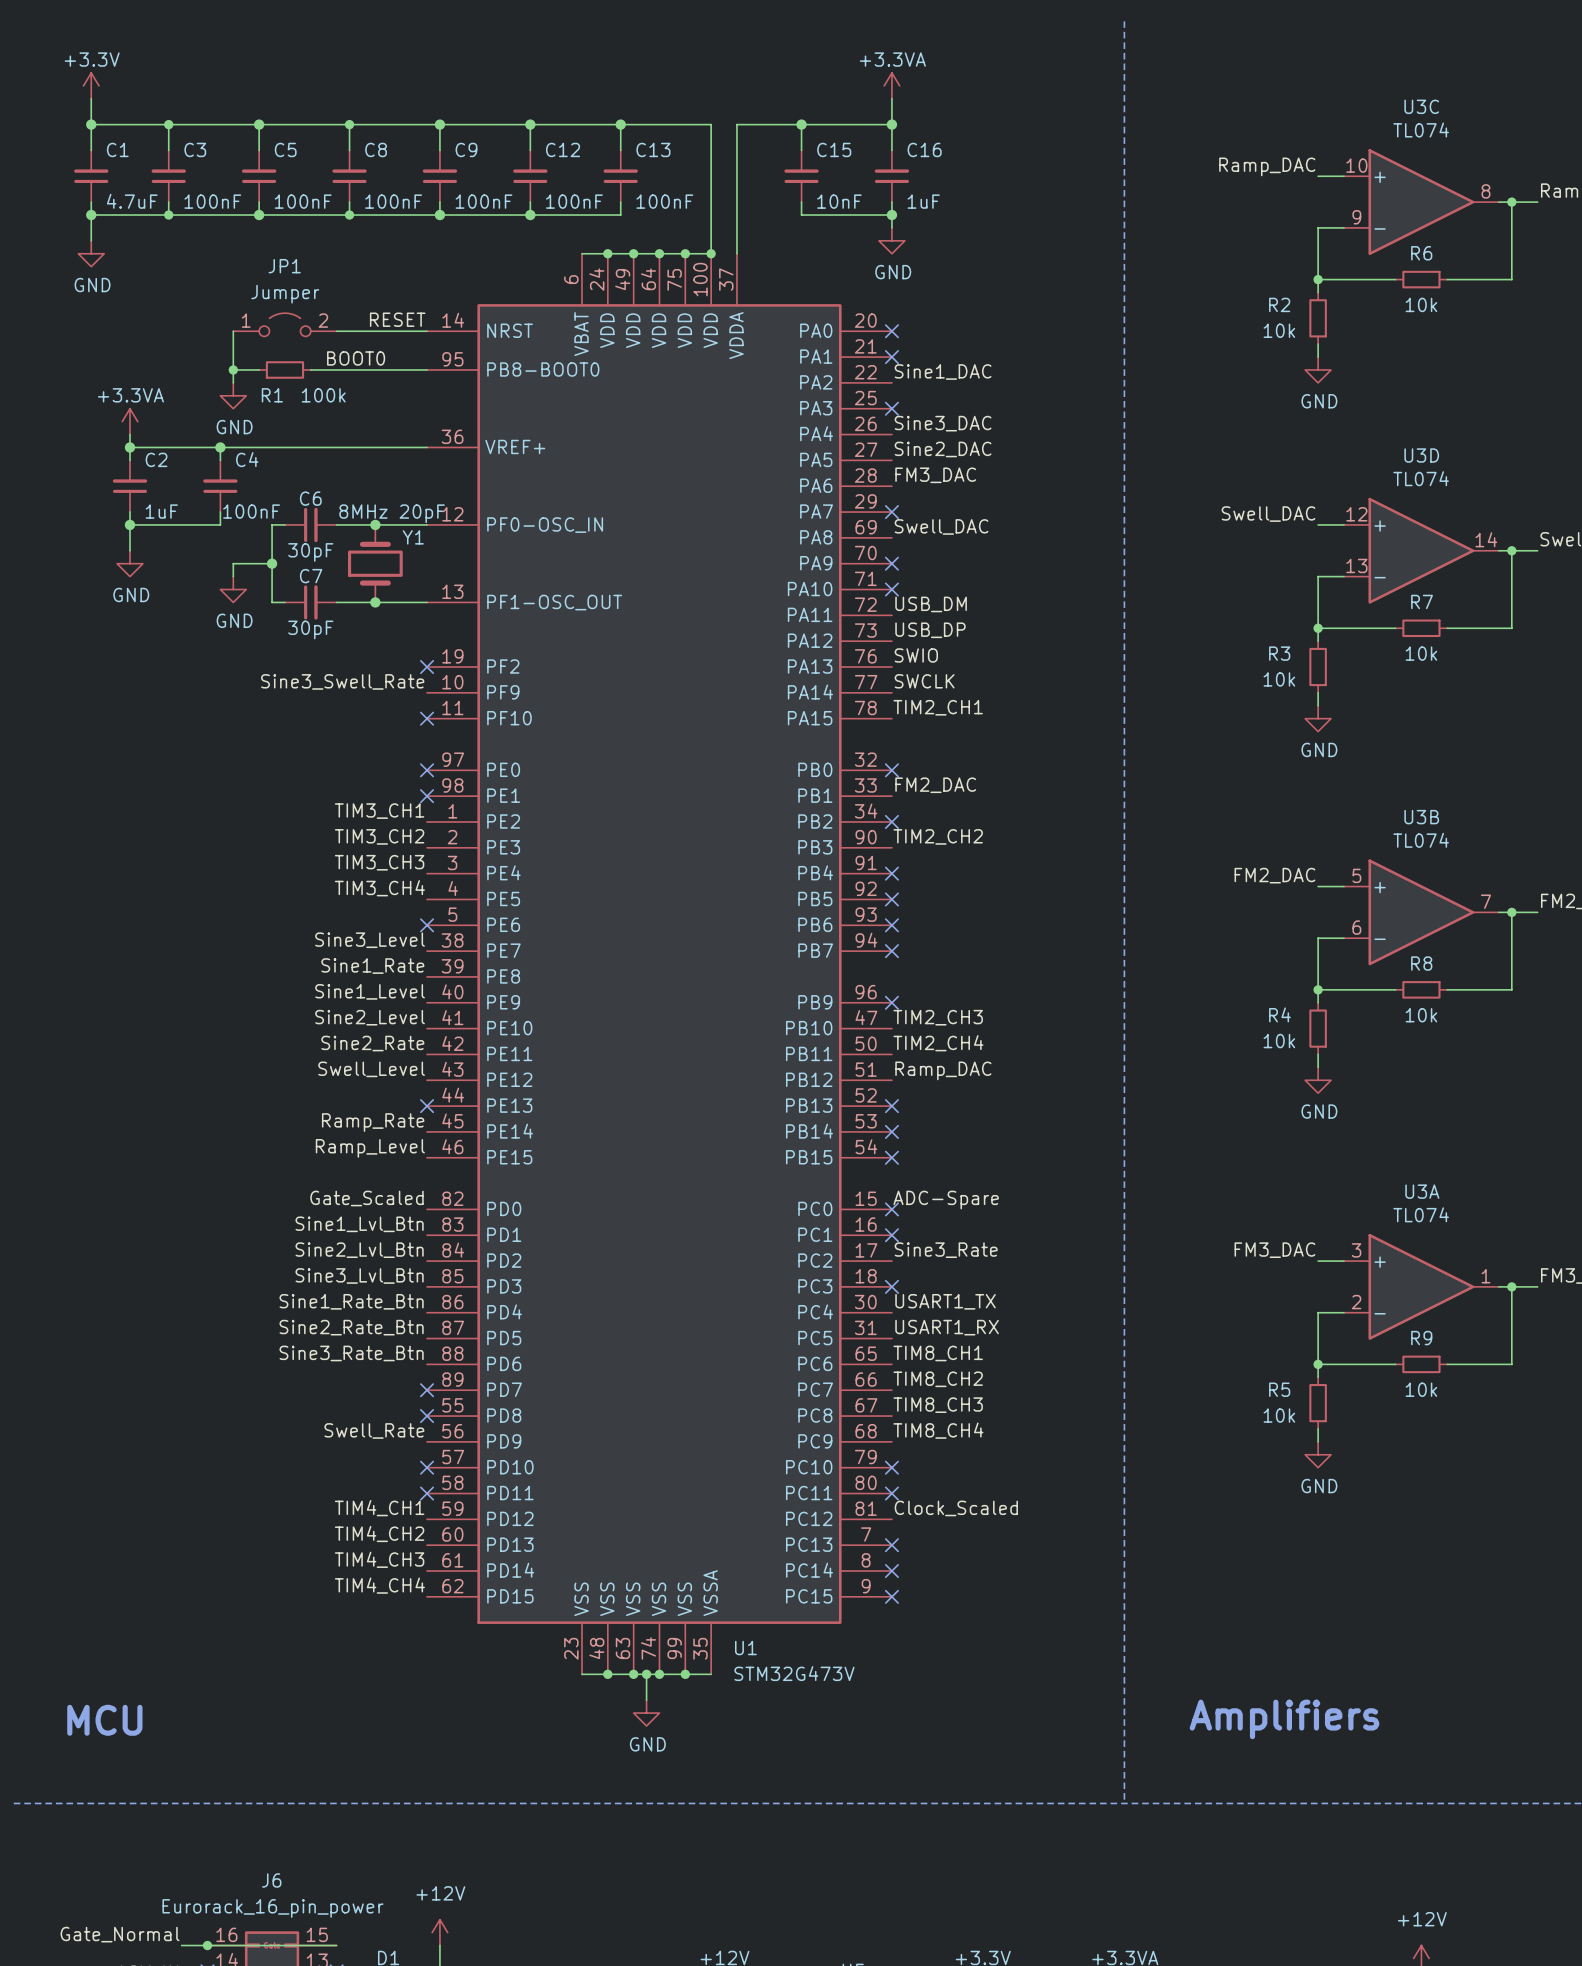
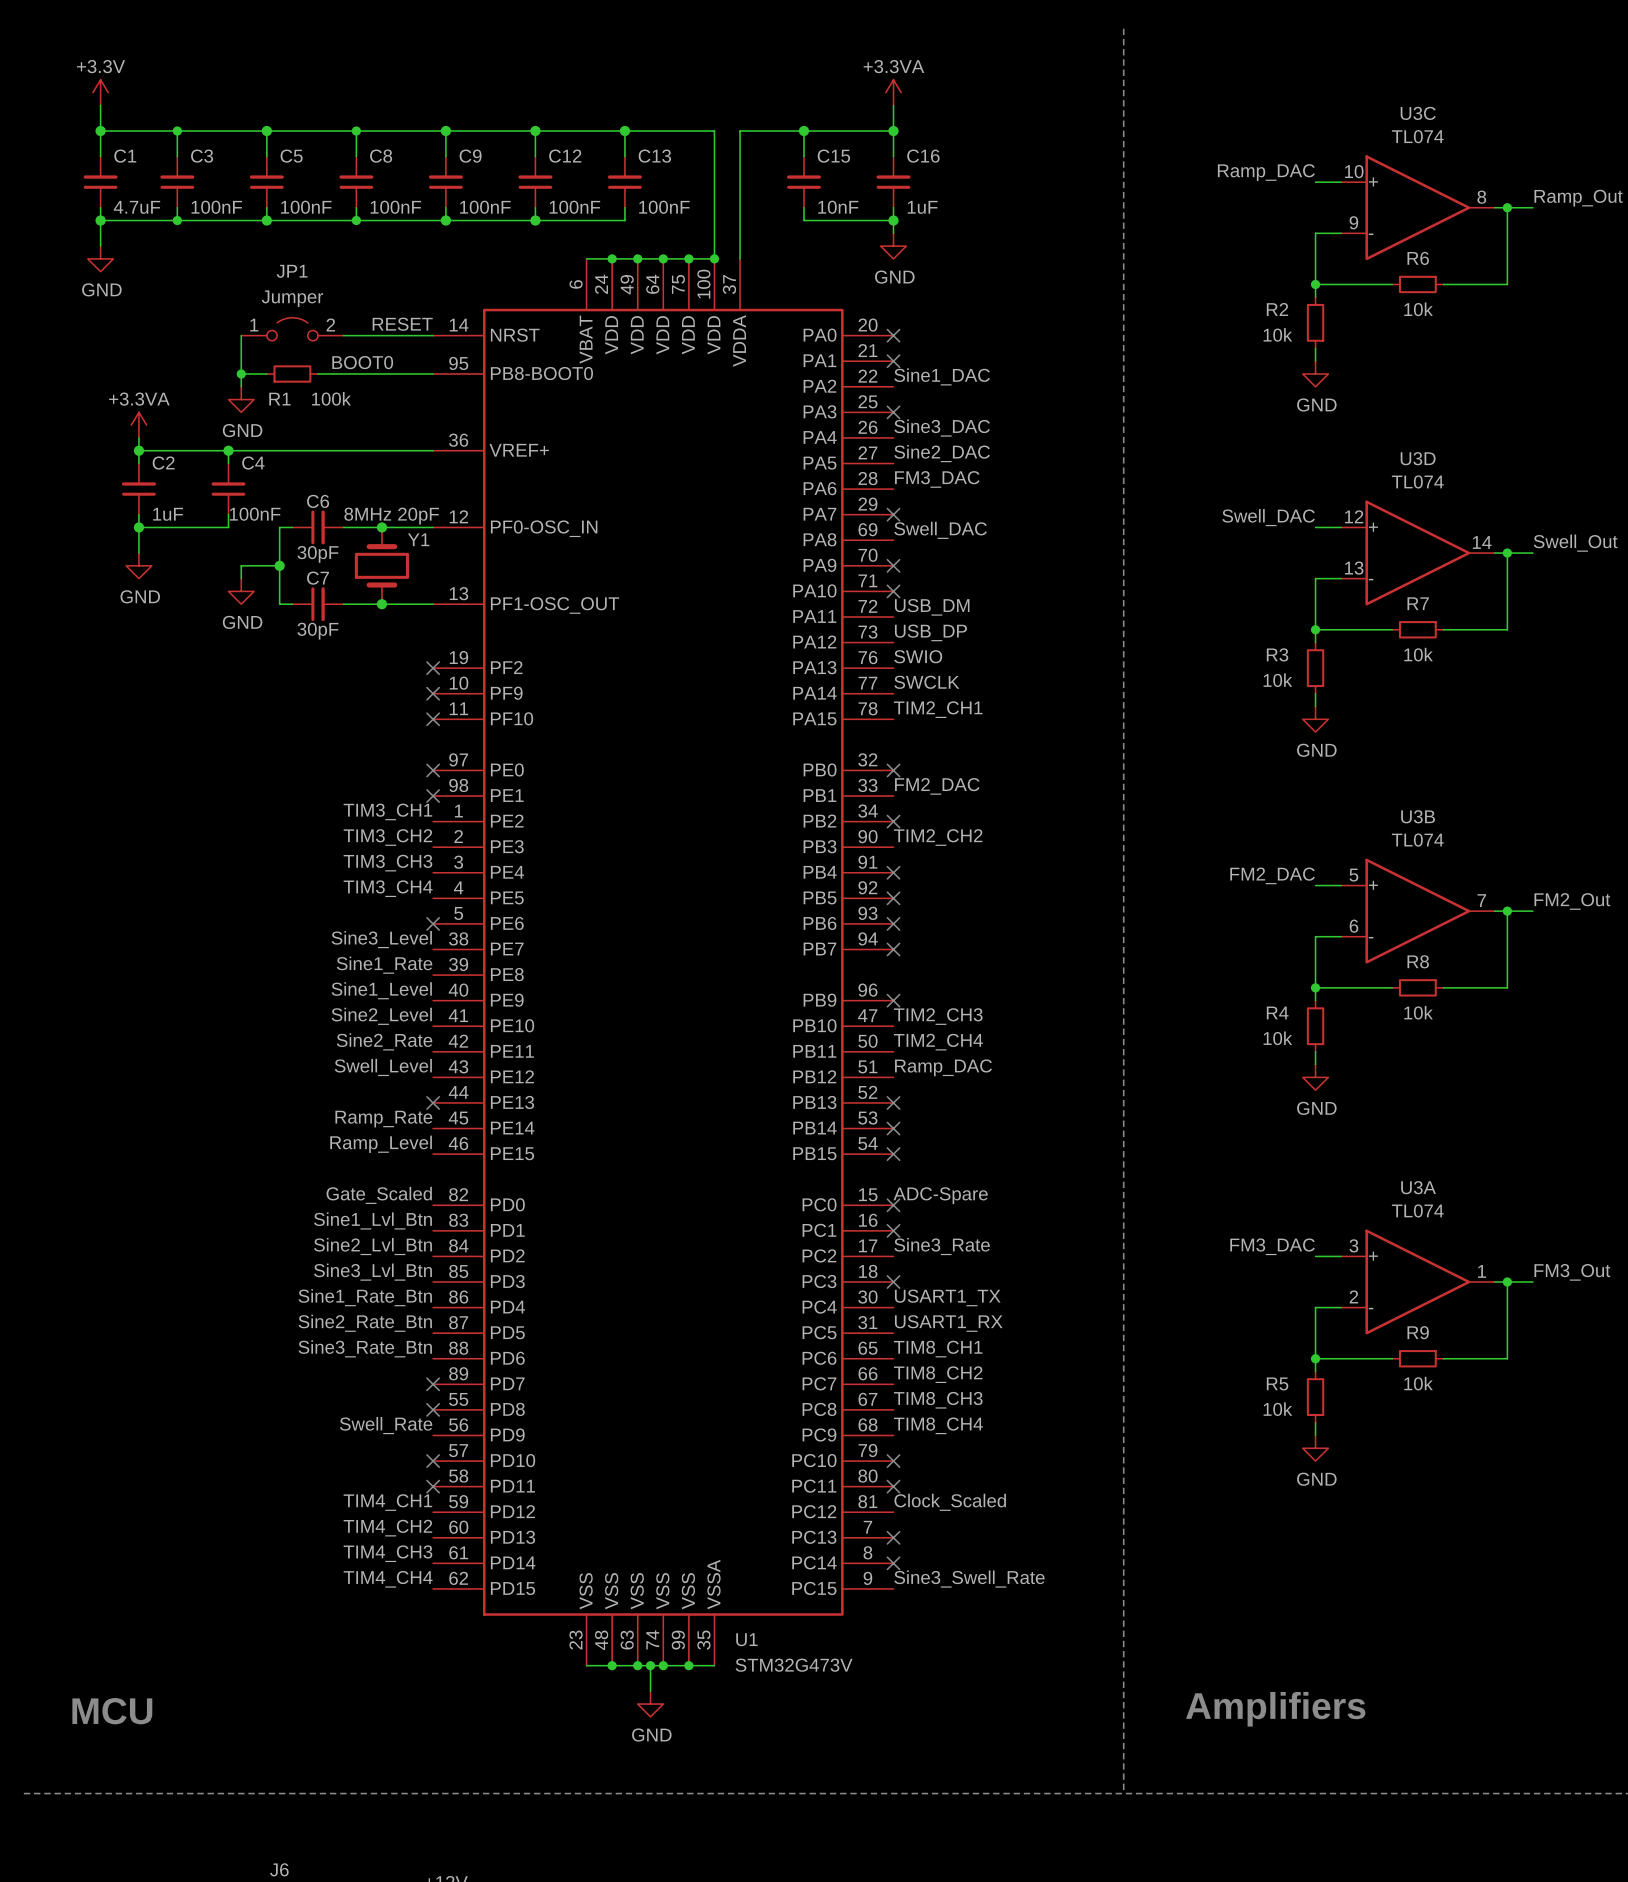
label: Sine3_Swell_Rate (342, 681) -> none
no-connect mark: none -> (433, 693)
label: none -> Sine3_Swell_Rate (969, 1579)
no-connect mark: (891, 1596) -> none

